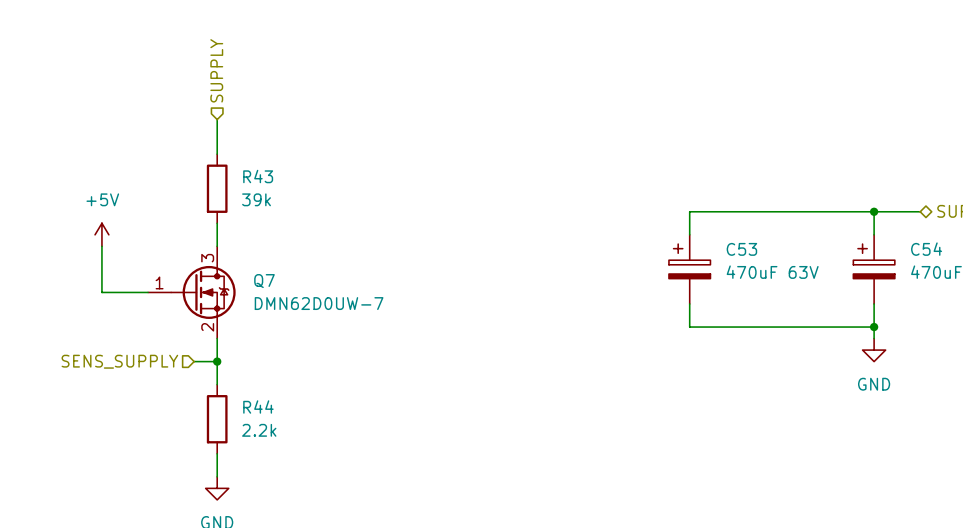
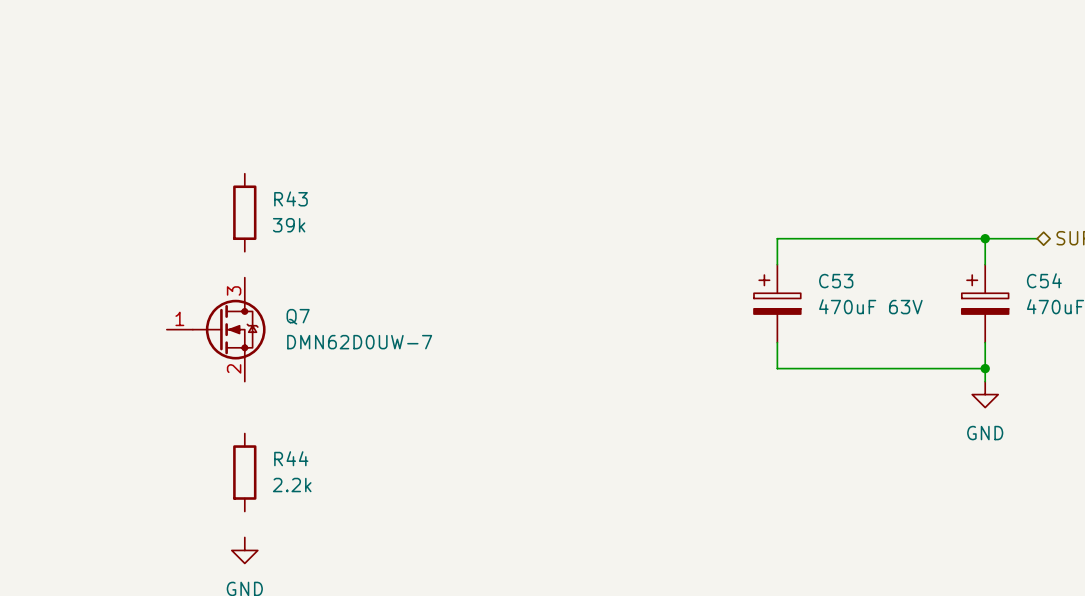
hierarchical label: SUPPLY (216, 70) -> none
wire: (217, 119) (217, 154) -> none
wire: (217, 223) (217, 246) -> none
power symbol: +5V (101, 234) -> none
wire: (101, 246) (101, 292) (148, 292) -> none
wire: (217, 338) (217, 384) -> none
hierarchical label: SENS_SUPPLY (119, 361) -> none
wire: (194, 361) (217, 361) -> none
junction: (217, 361) -> none
wire: (217, 453) (217, 476) -> none

